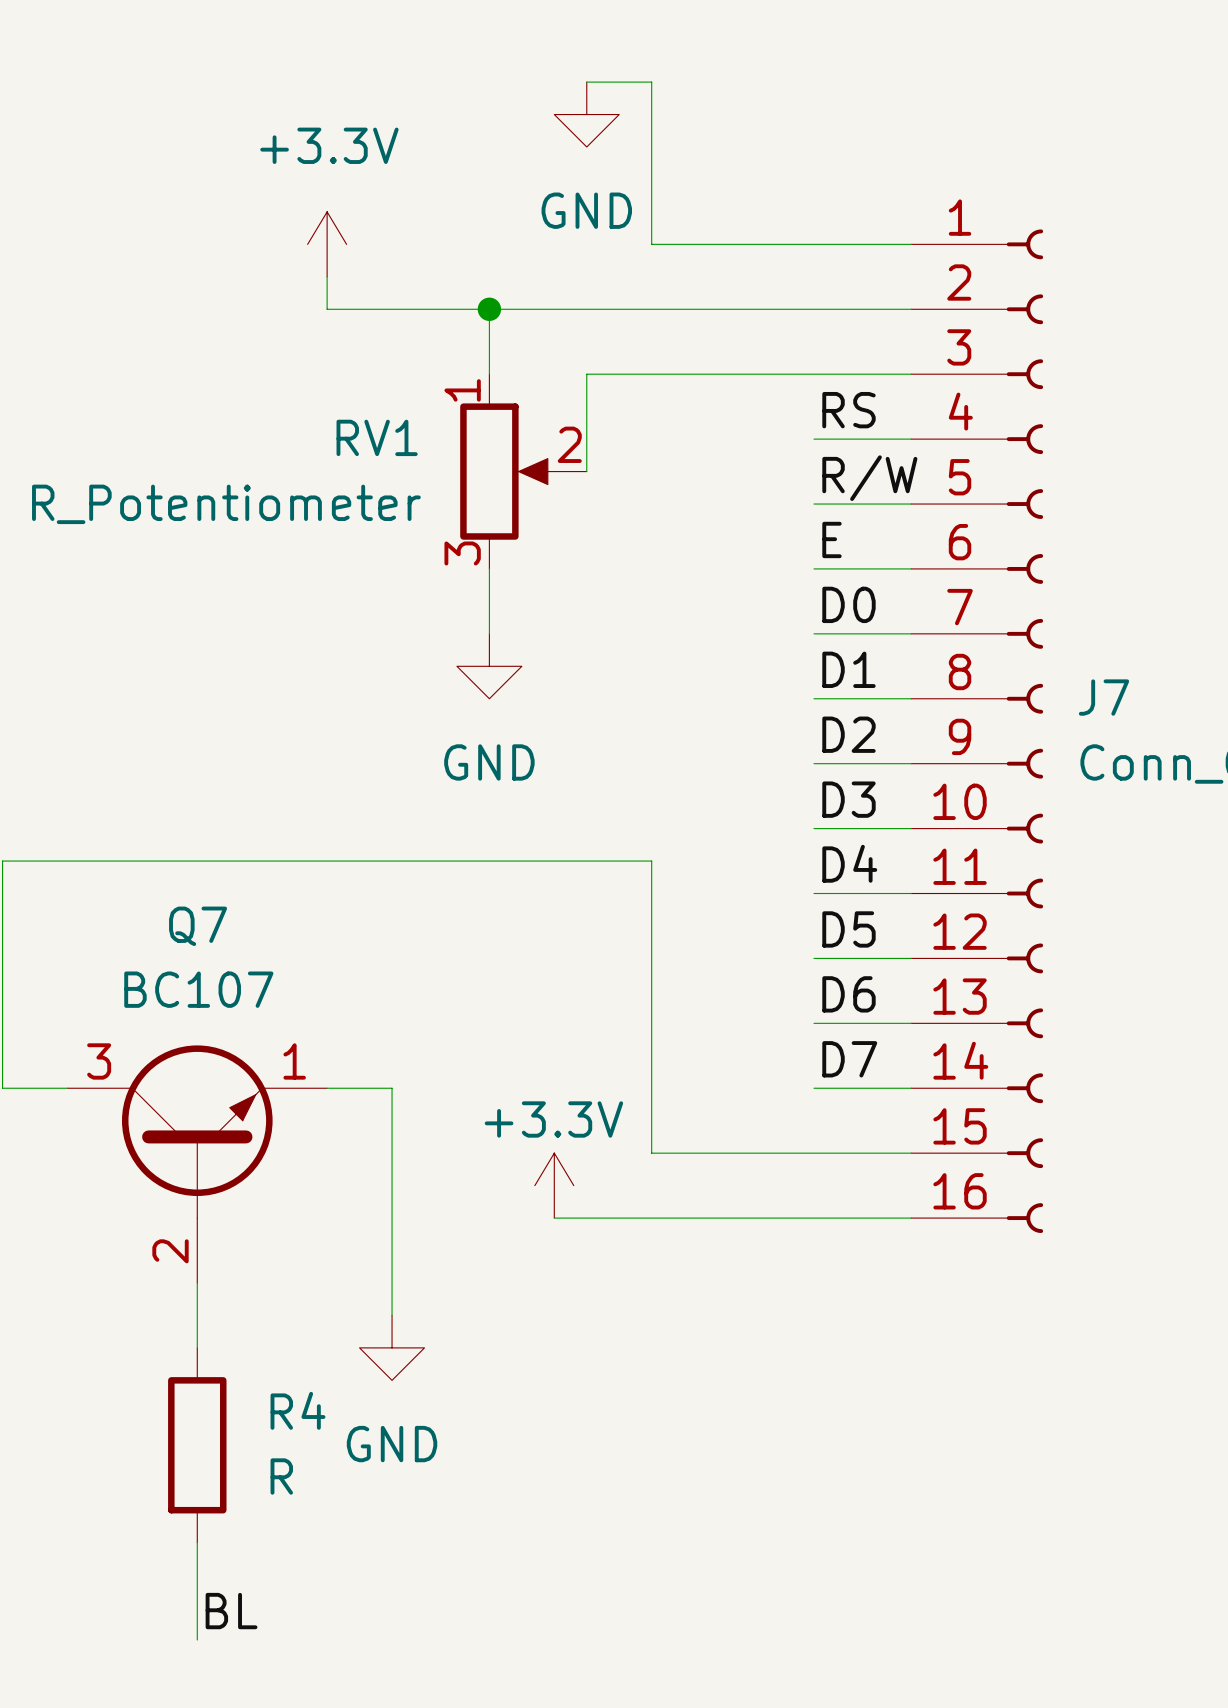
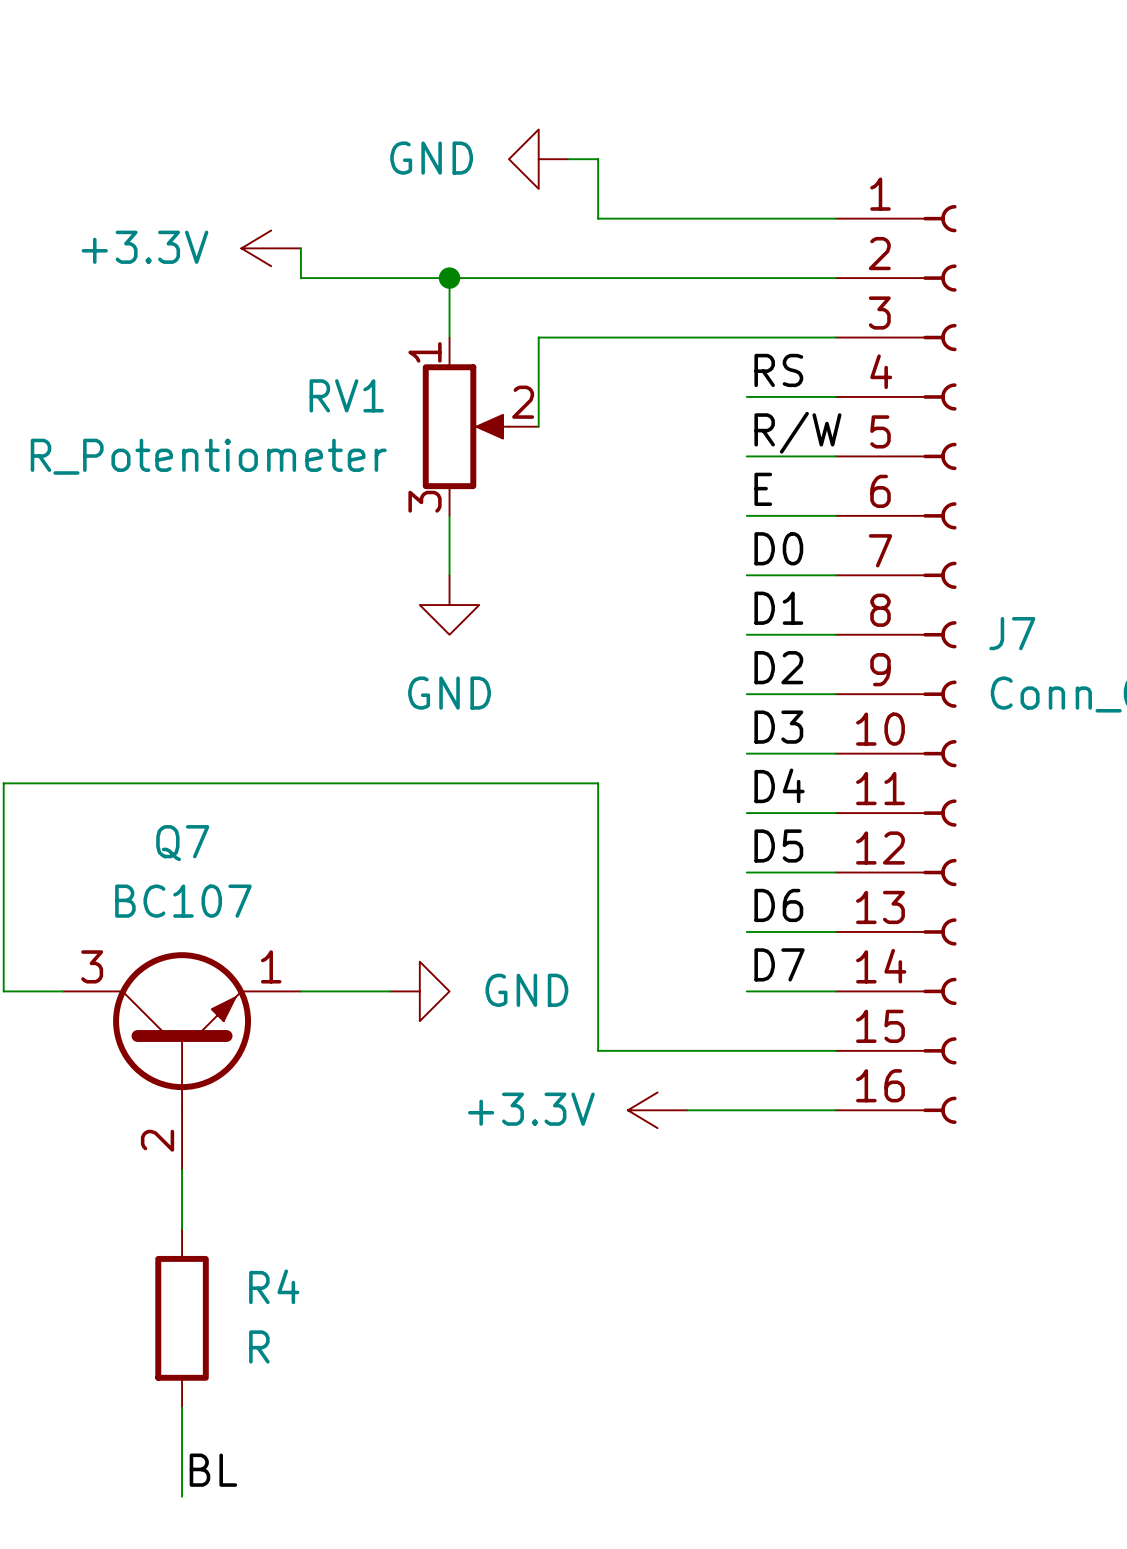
wire: (586, 82) (651, 82) (651, 179) -> (568, 159) (598, 159)
power symbol rotation: 0° (586, 114) -> 90° clockwise (538, 159)
power symbol position: GND (586, 114) -> GND (538, 159)
power symbol text position: +3.3V (329, 145) -> +3.3V (145, 247)
power symbol rotation: 0° (327, 244) -> 90° counterclockwise (271, 248)
power symbol position: +3.3V (327, 244) -> +3.3V (271, 248)
wire: (392, 1088) (392, 1315) -> (360, 991) (390, 991)
power symbol text position: +3.3V (553, 1119) -> +3.3V (531, 1109)
power symbol rotation: 0° (554, 1185) -> 90° counterclockwise (657, 1110)
power symbol position: +3.3V (554, 1185) -> +3.3V (657, 1110)
wire: (554, 1218) (749, 1218) -> none
power symbol rotation: 0° (392, 1347) -> 90° counterclockwise (419, 991)
power symbol position: GND (392, 1347) -> GND (419, 991)

